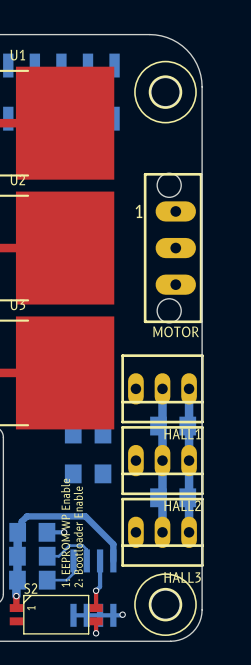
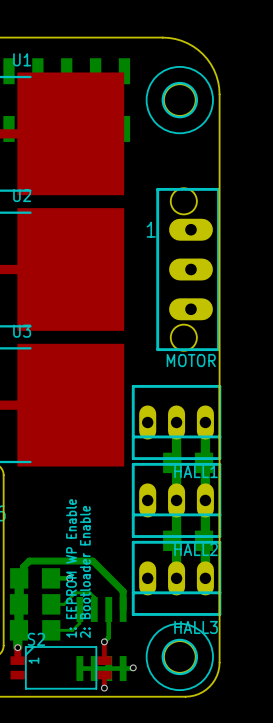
part: (88, 434) -> none
part: (88, 473) -> none

